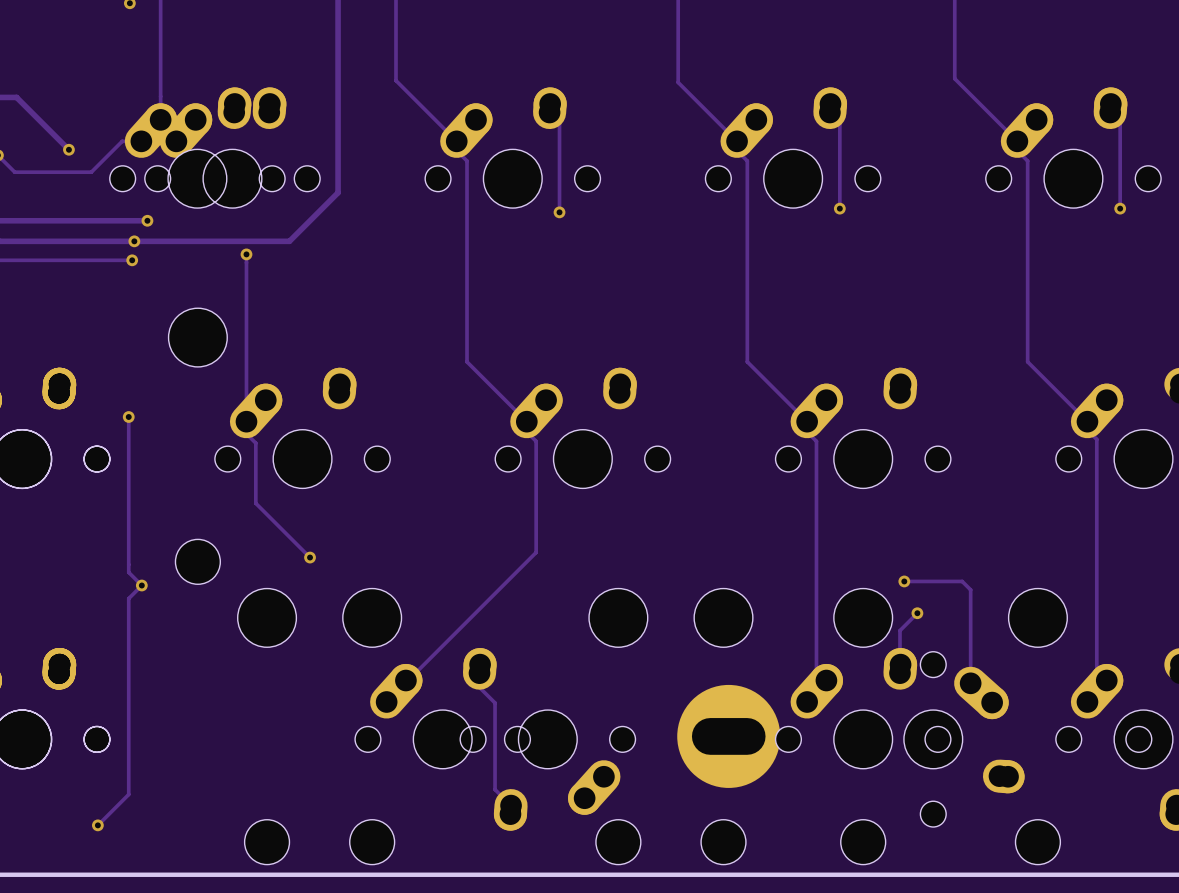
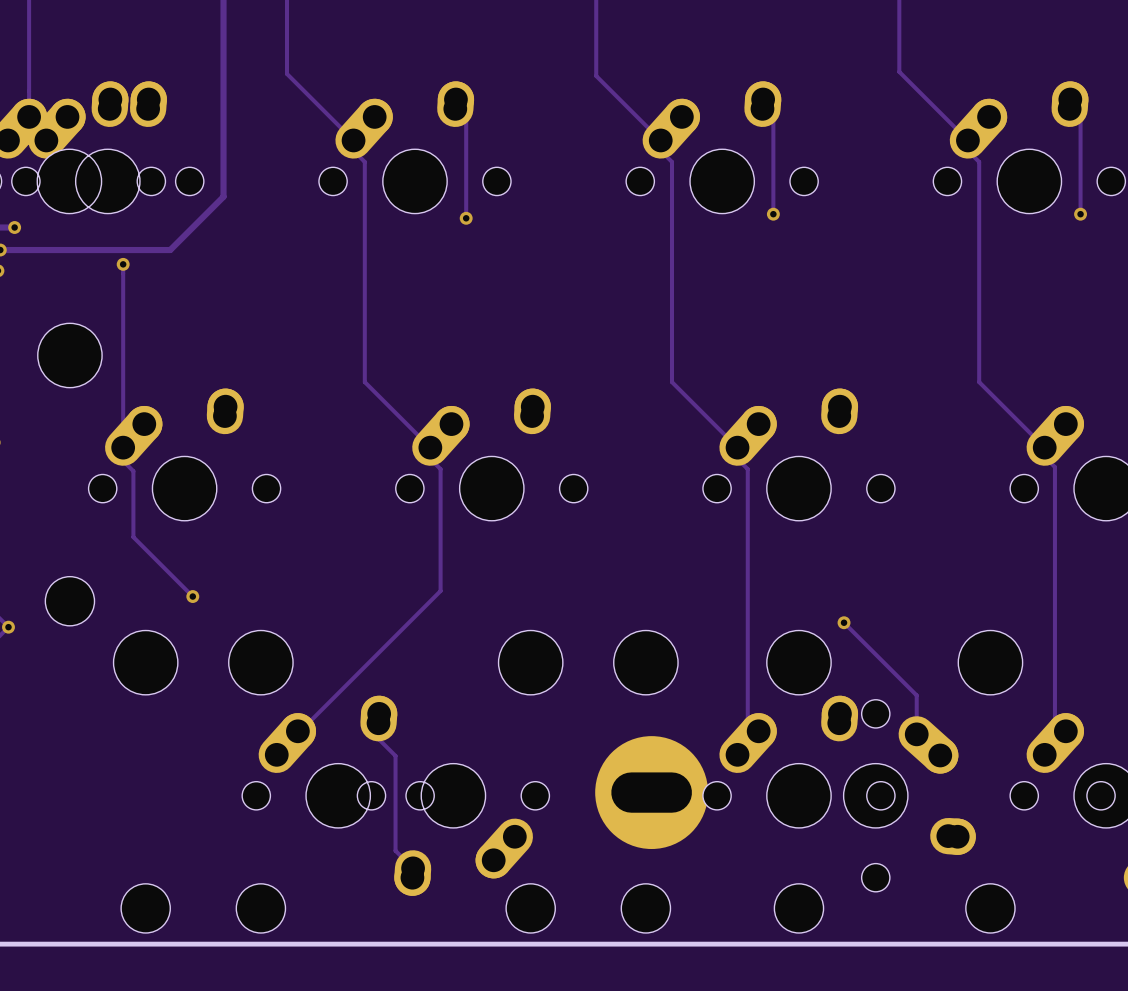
track: (904, 581) (962, 581) (970, 589) (970, 647) -> (844, 622) (916, 695)
track: (917, 613) (899, 630) (899, 673) -> none
via: (917, 613) -> none

